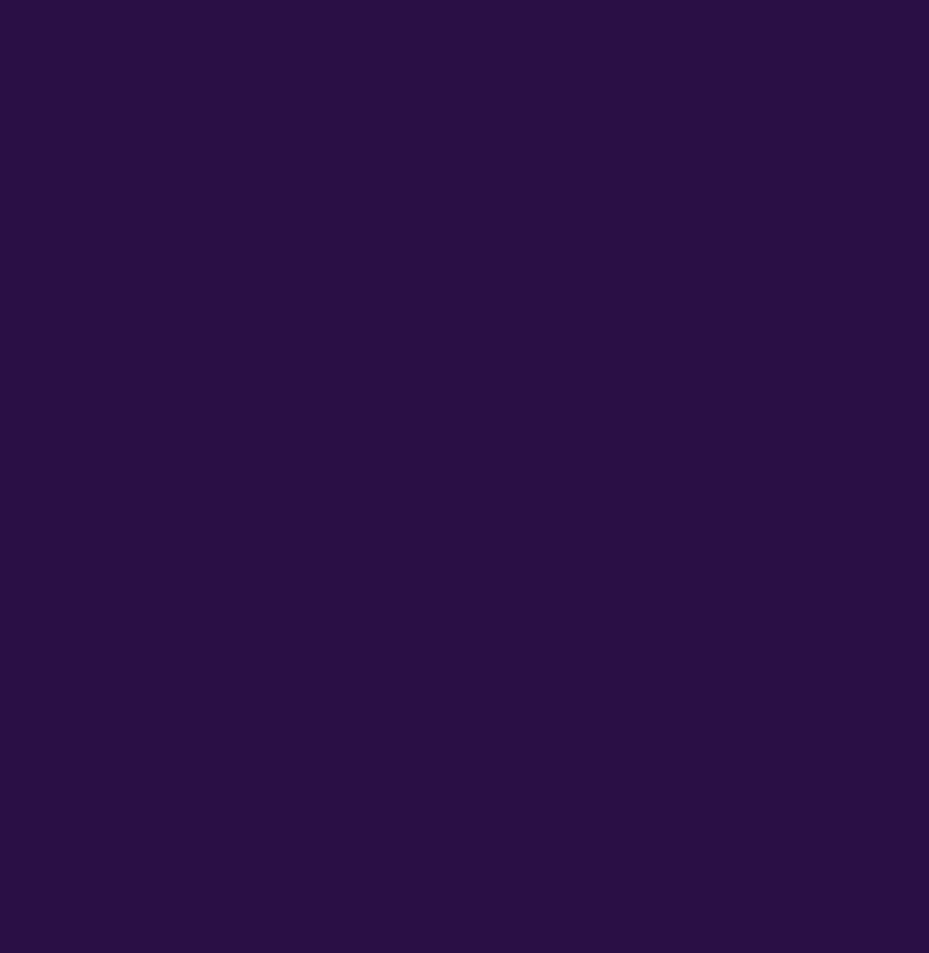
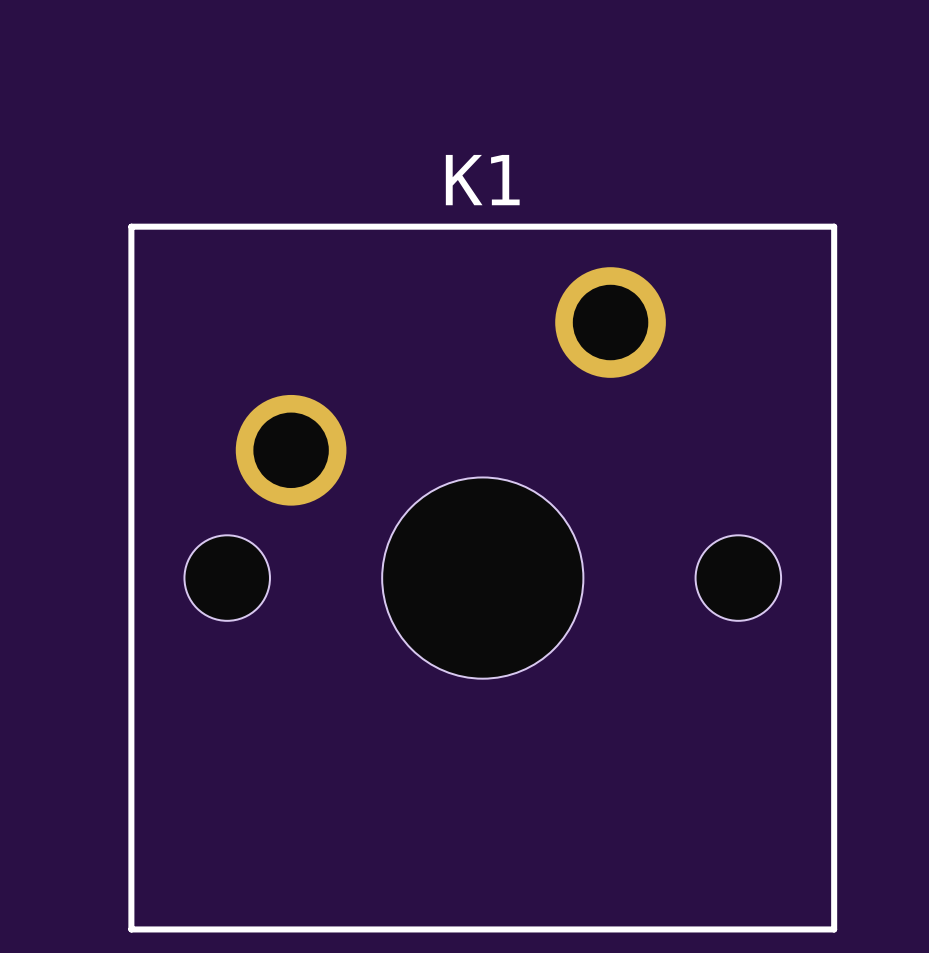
K1: none -> (482, 578)

